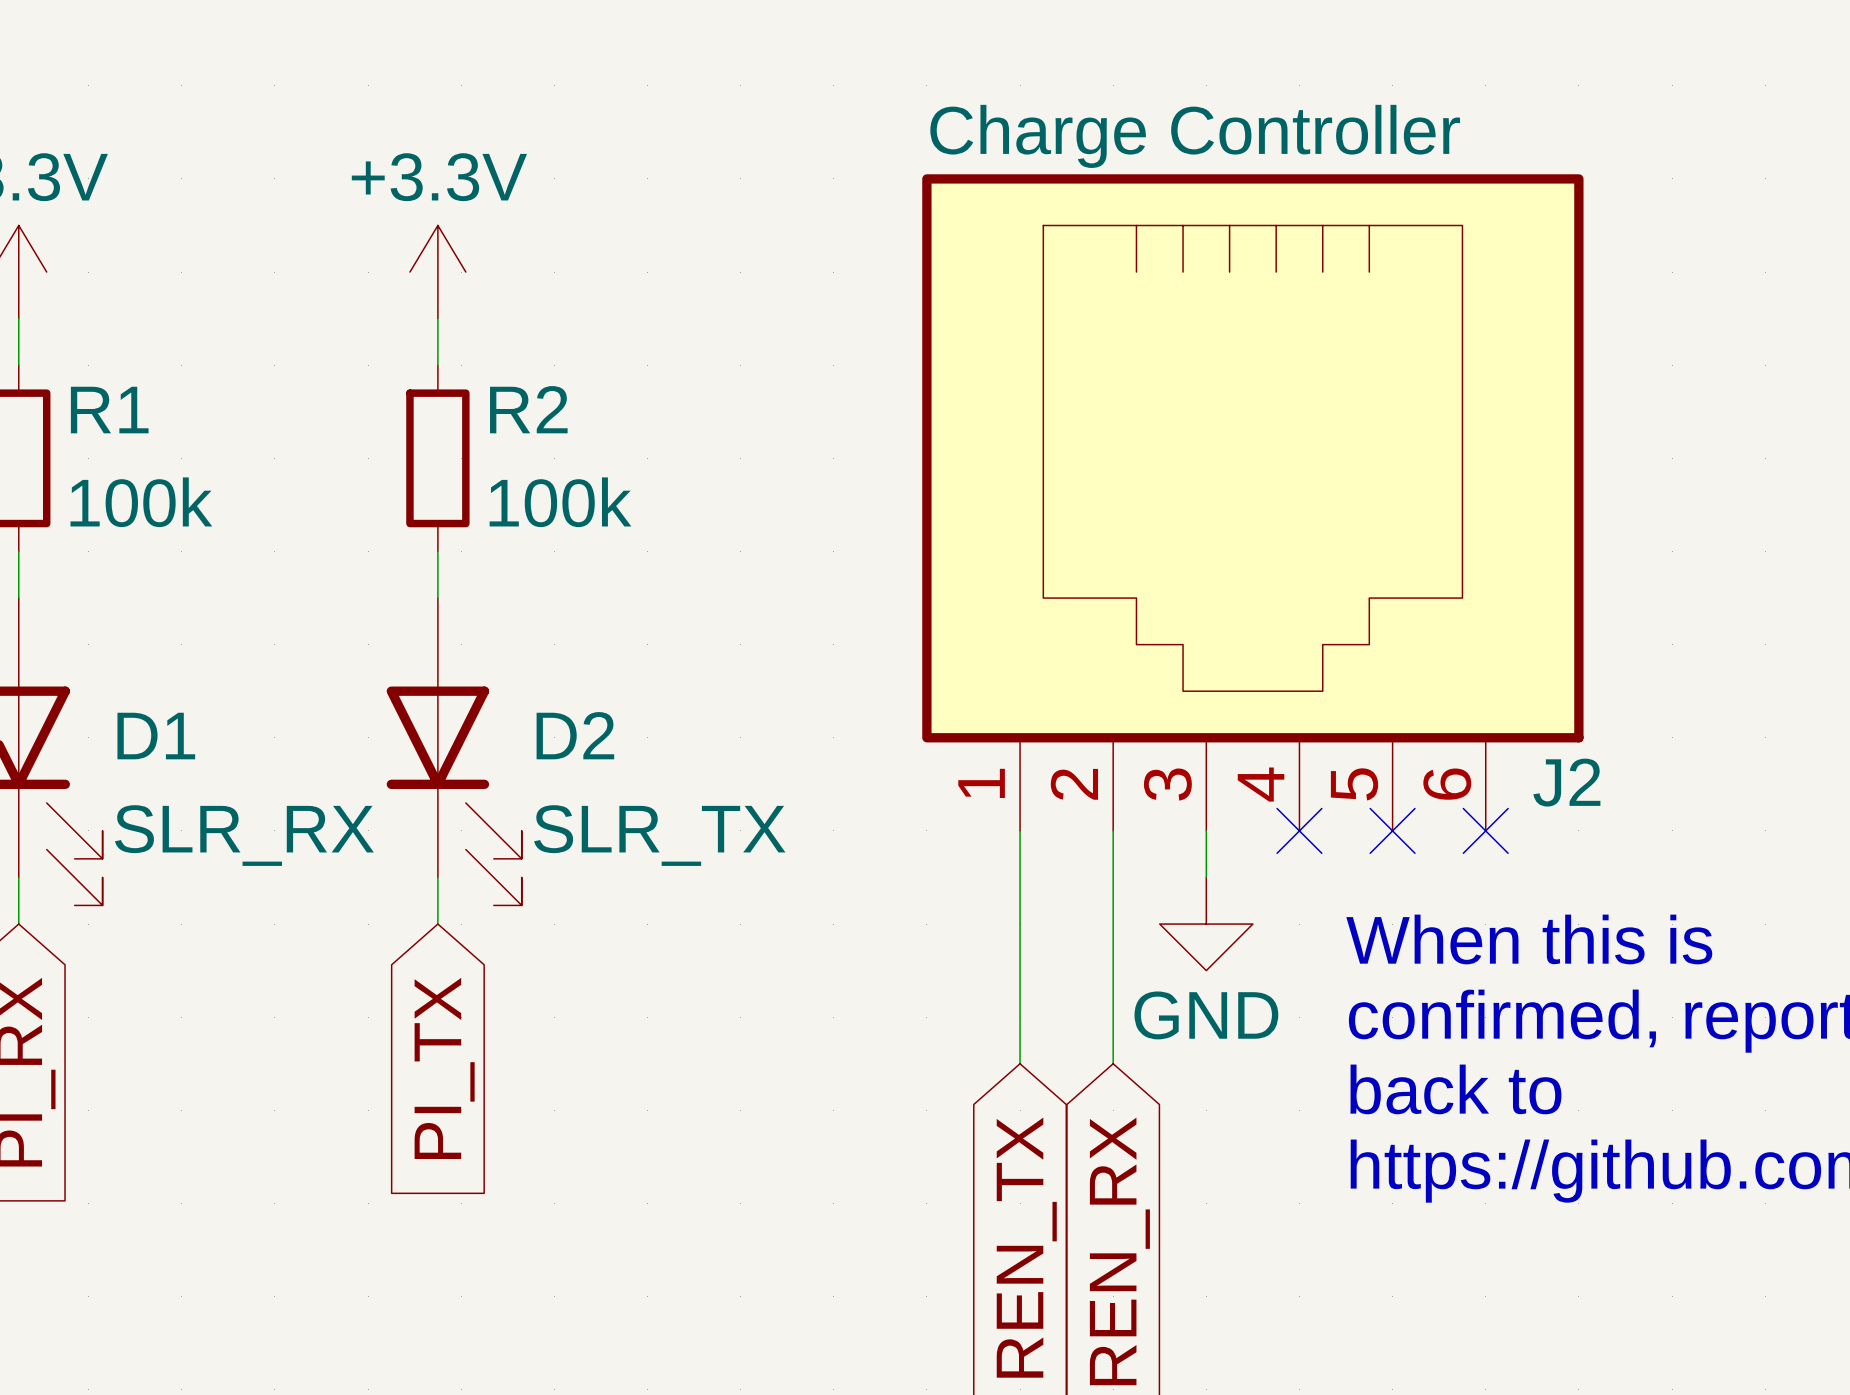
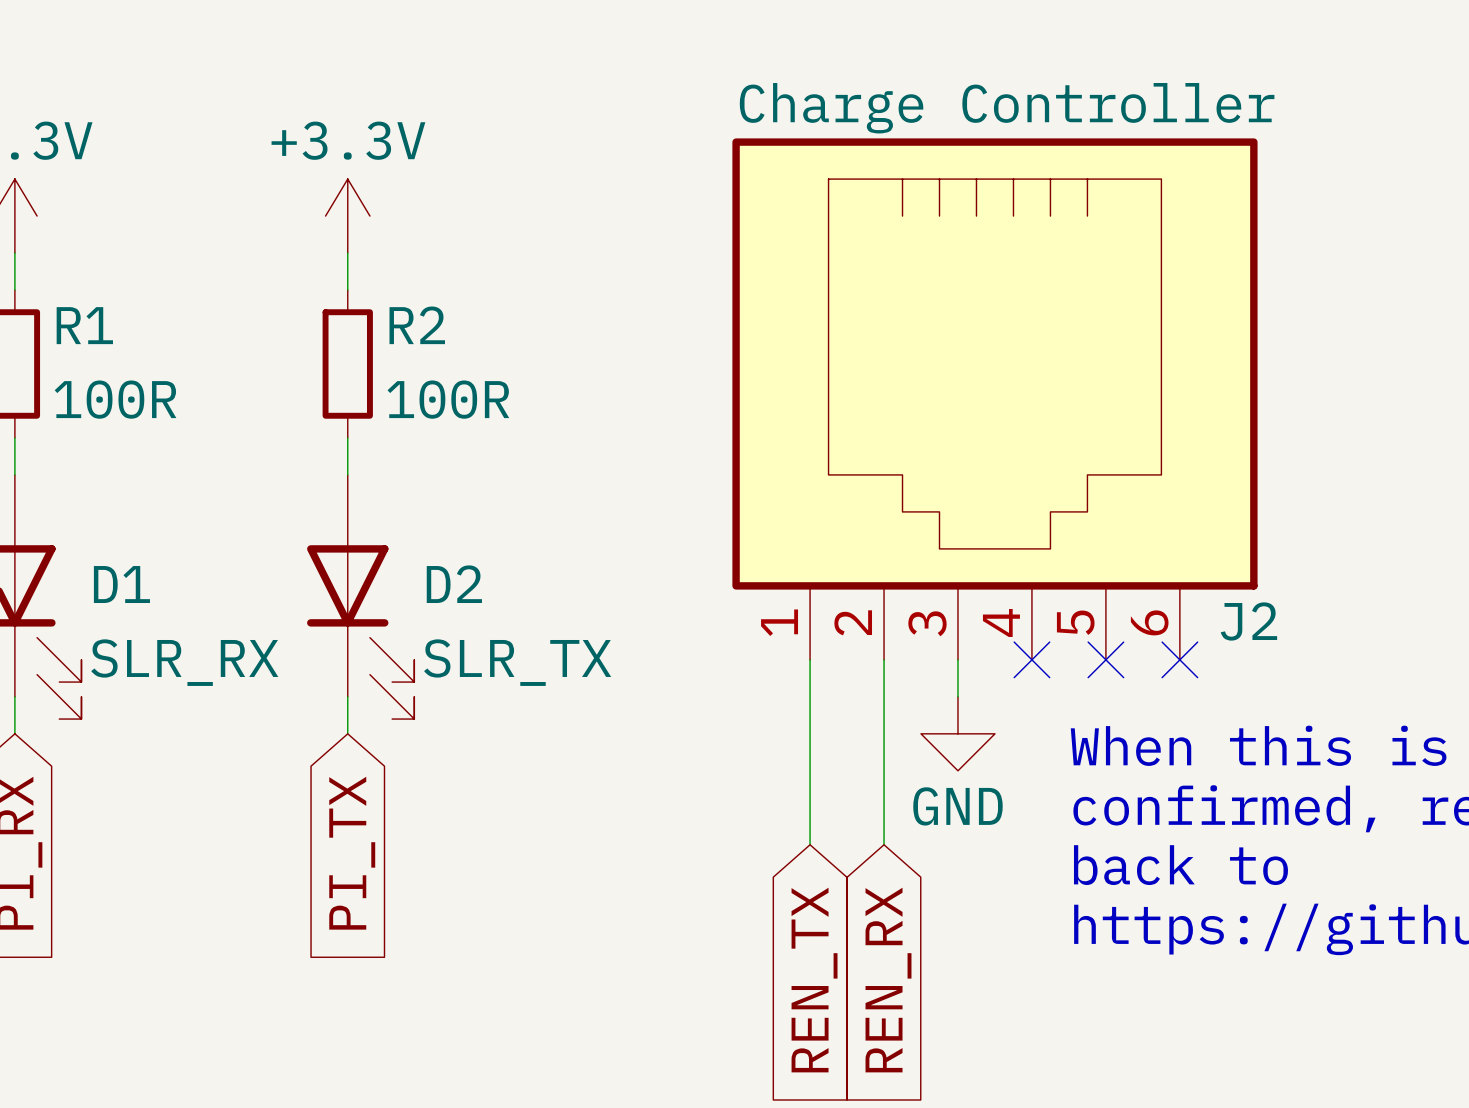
R1 value: 100k (141, 502) -> 100R (115, 399)
R2 value: 100k (560, 502) -> 100R (448, 399)

